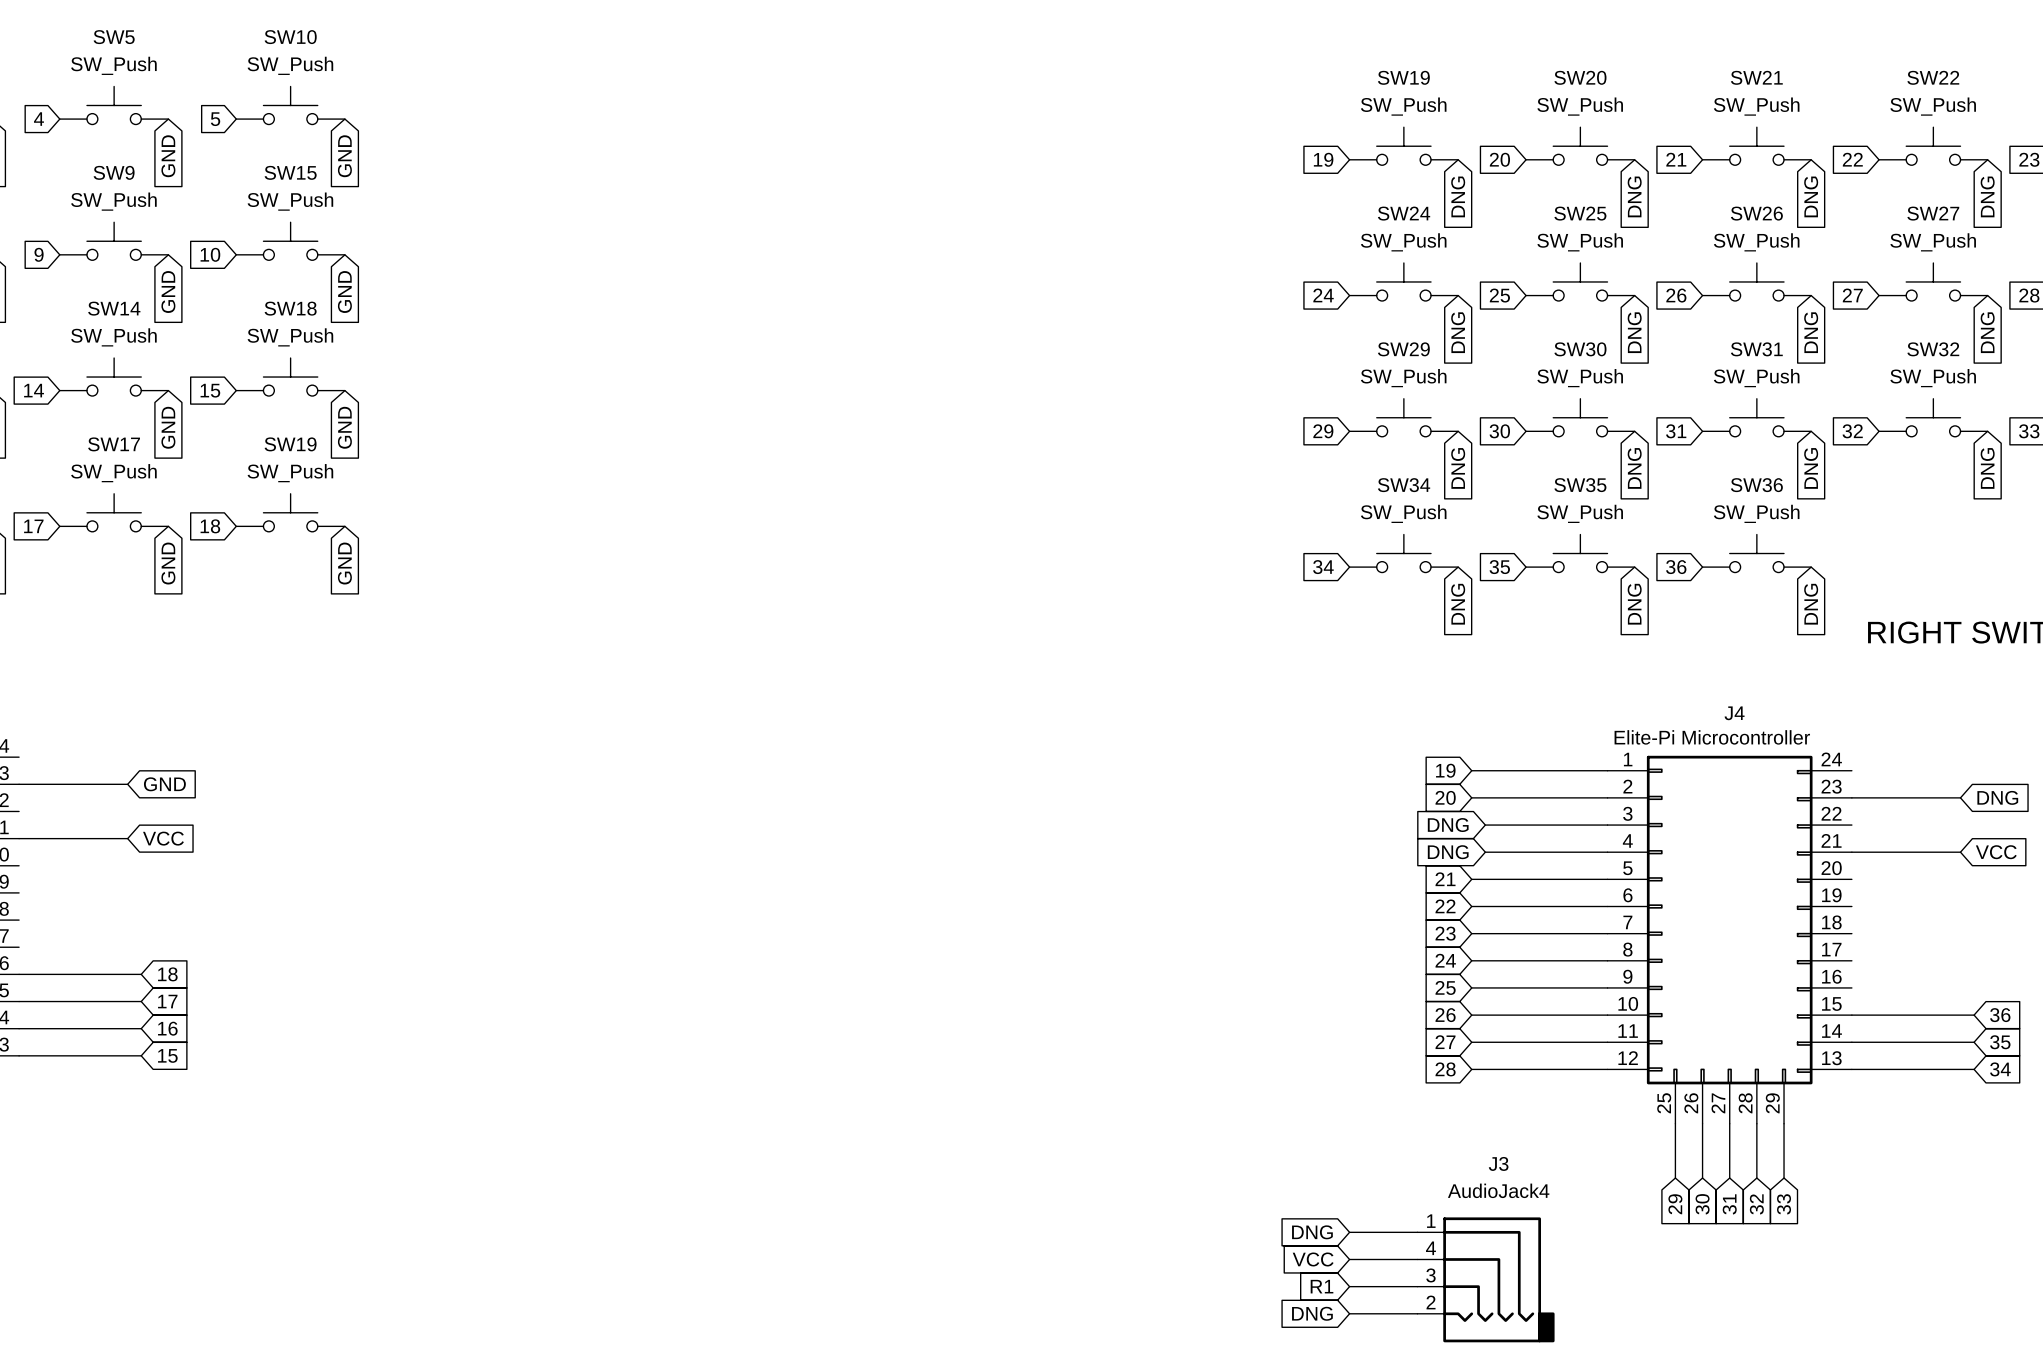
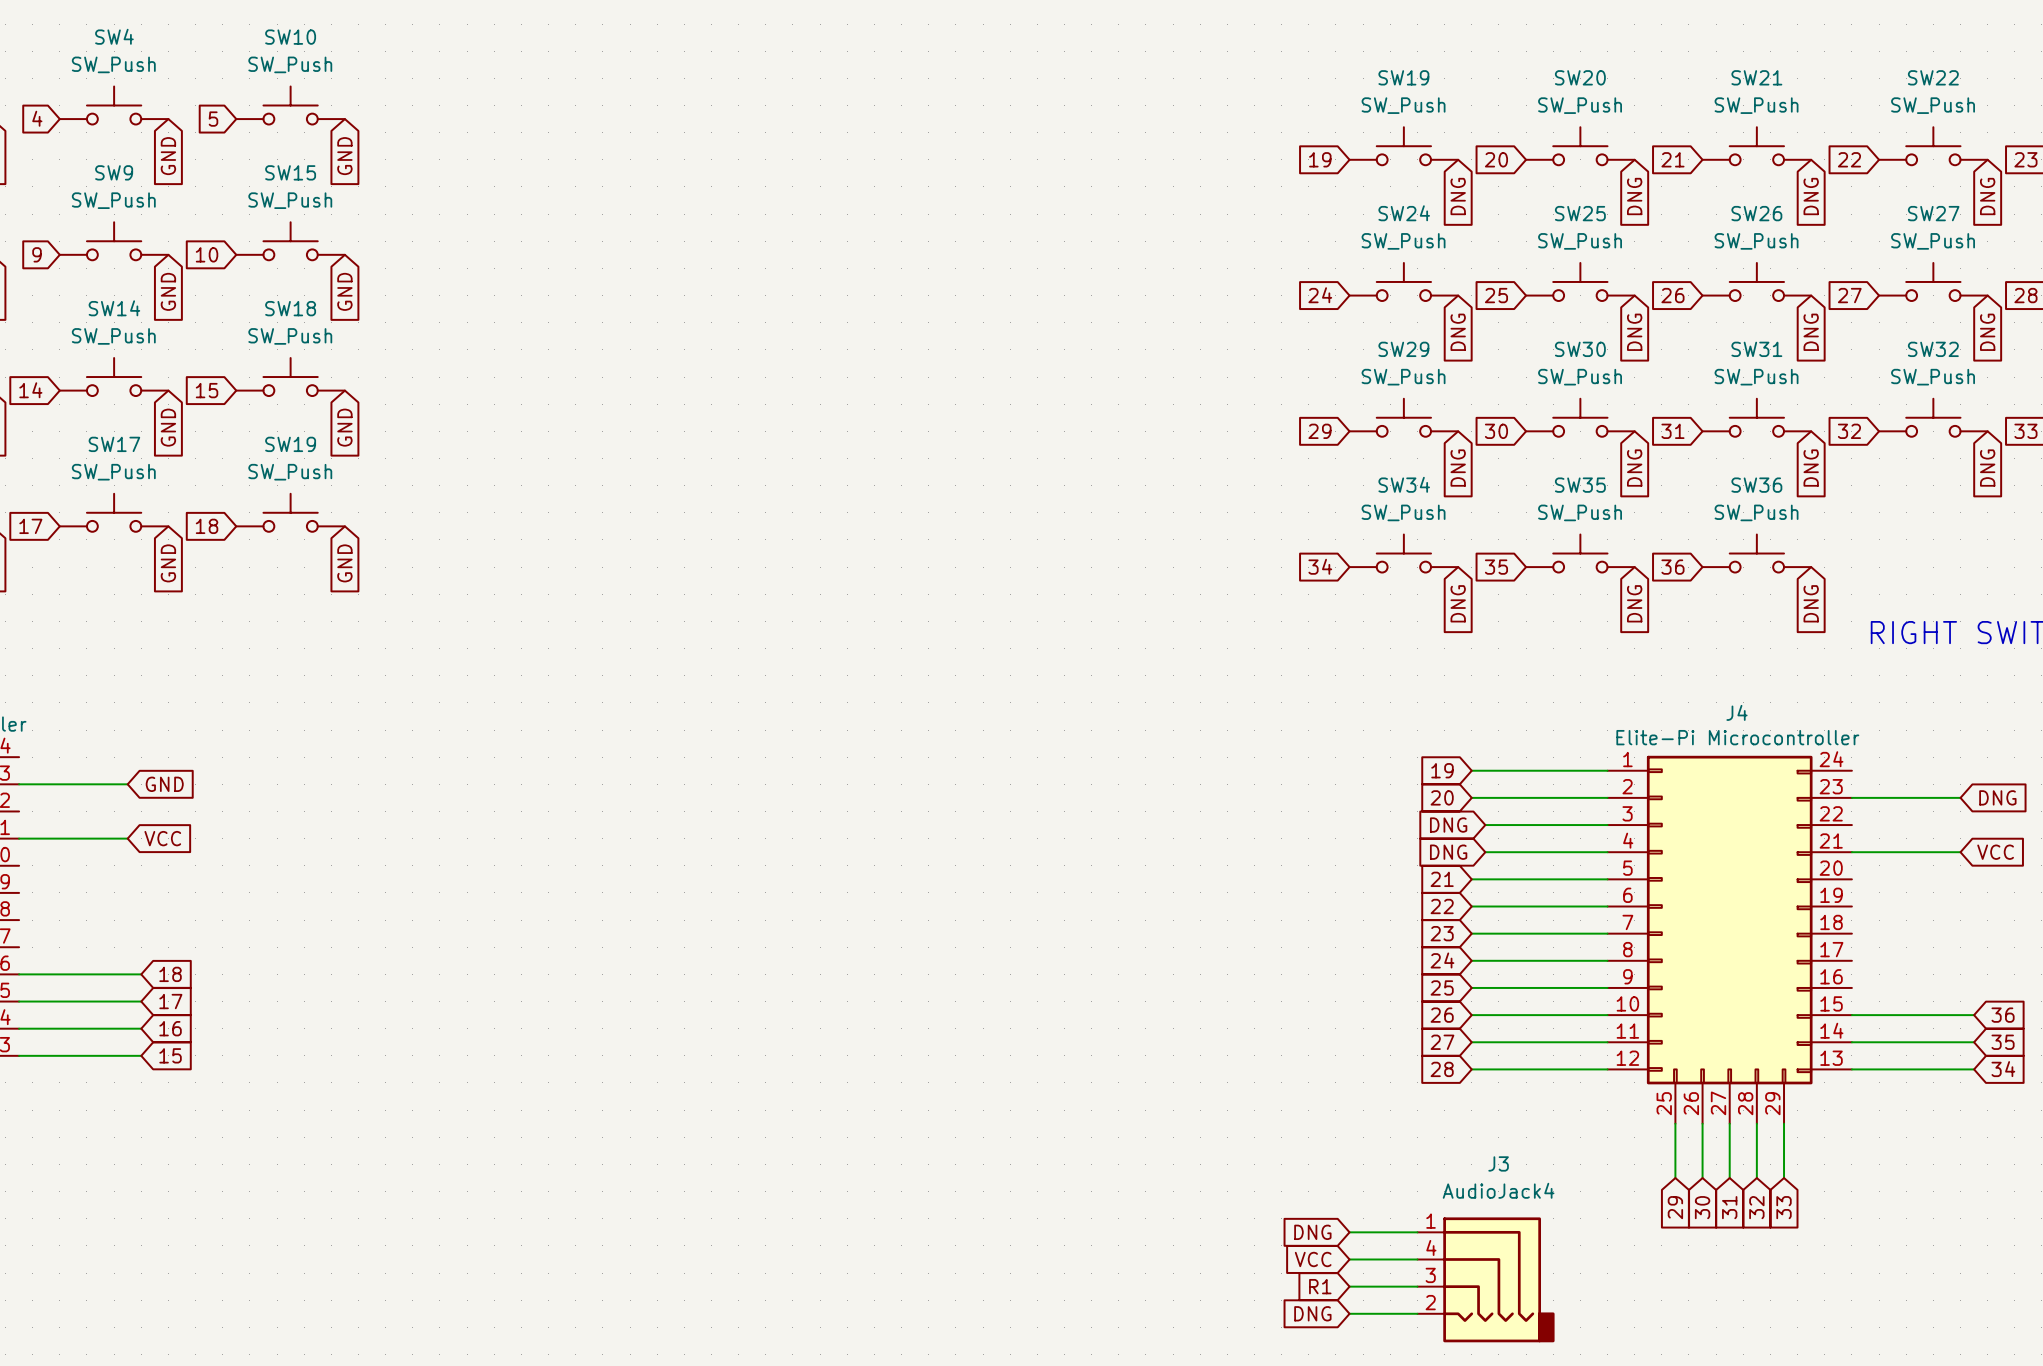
SW5 name: SW5 (114, 37) -> SW4 (114, 36)

